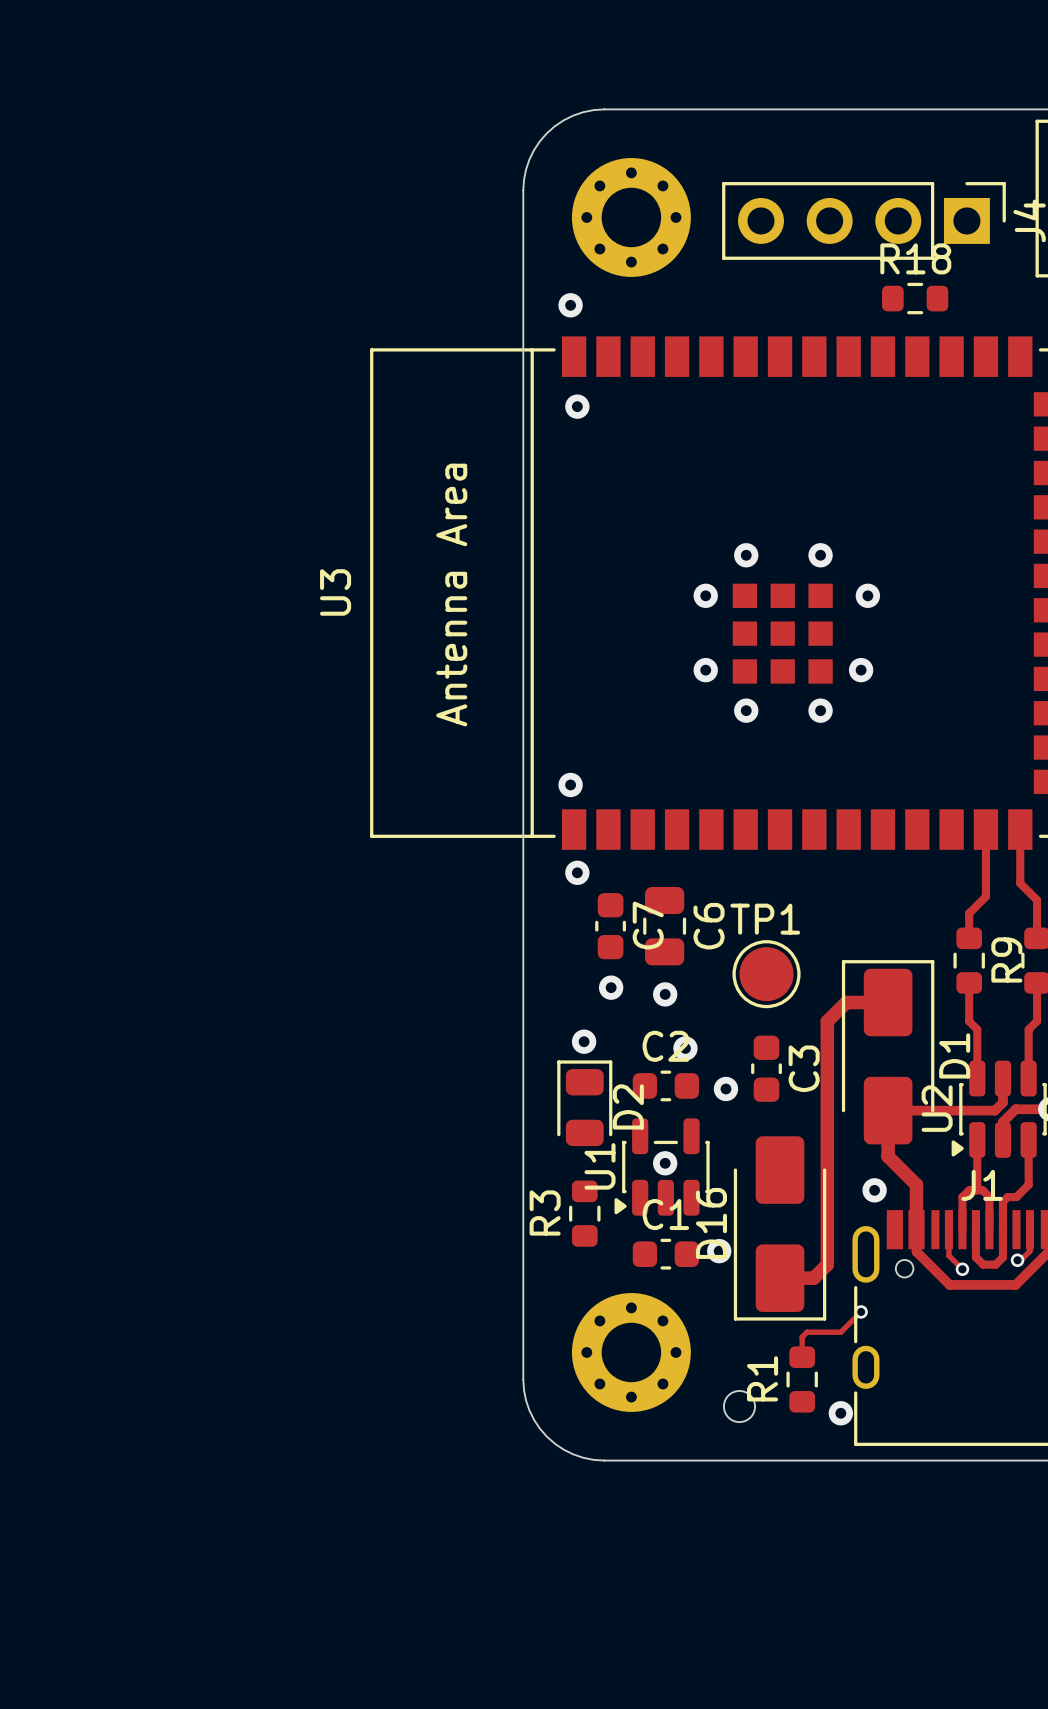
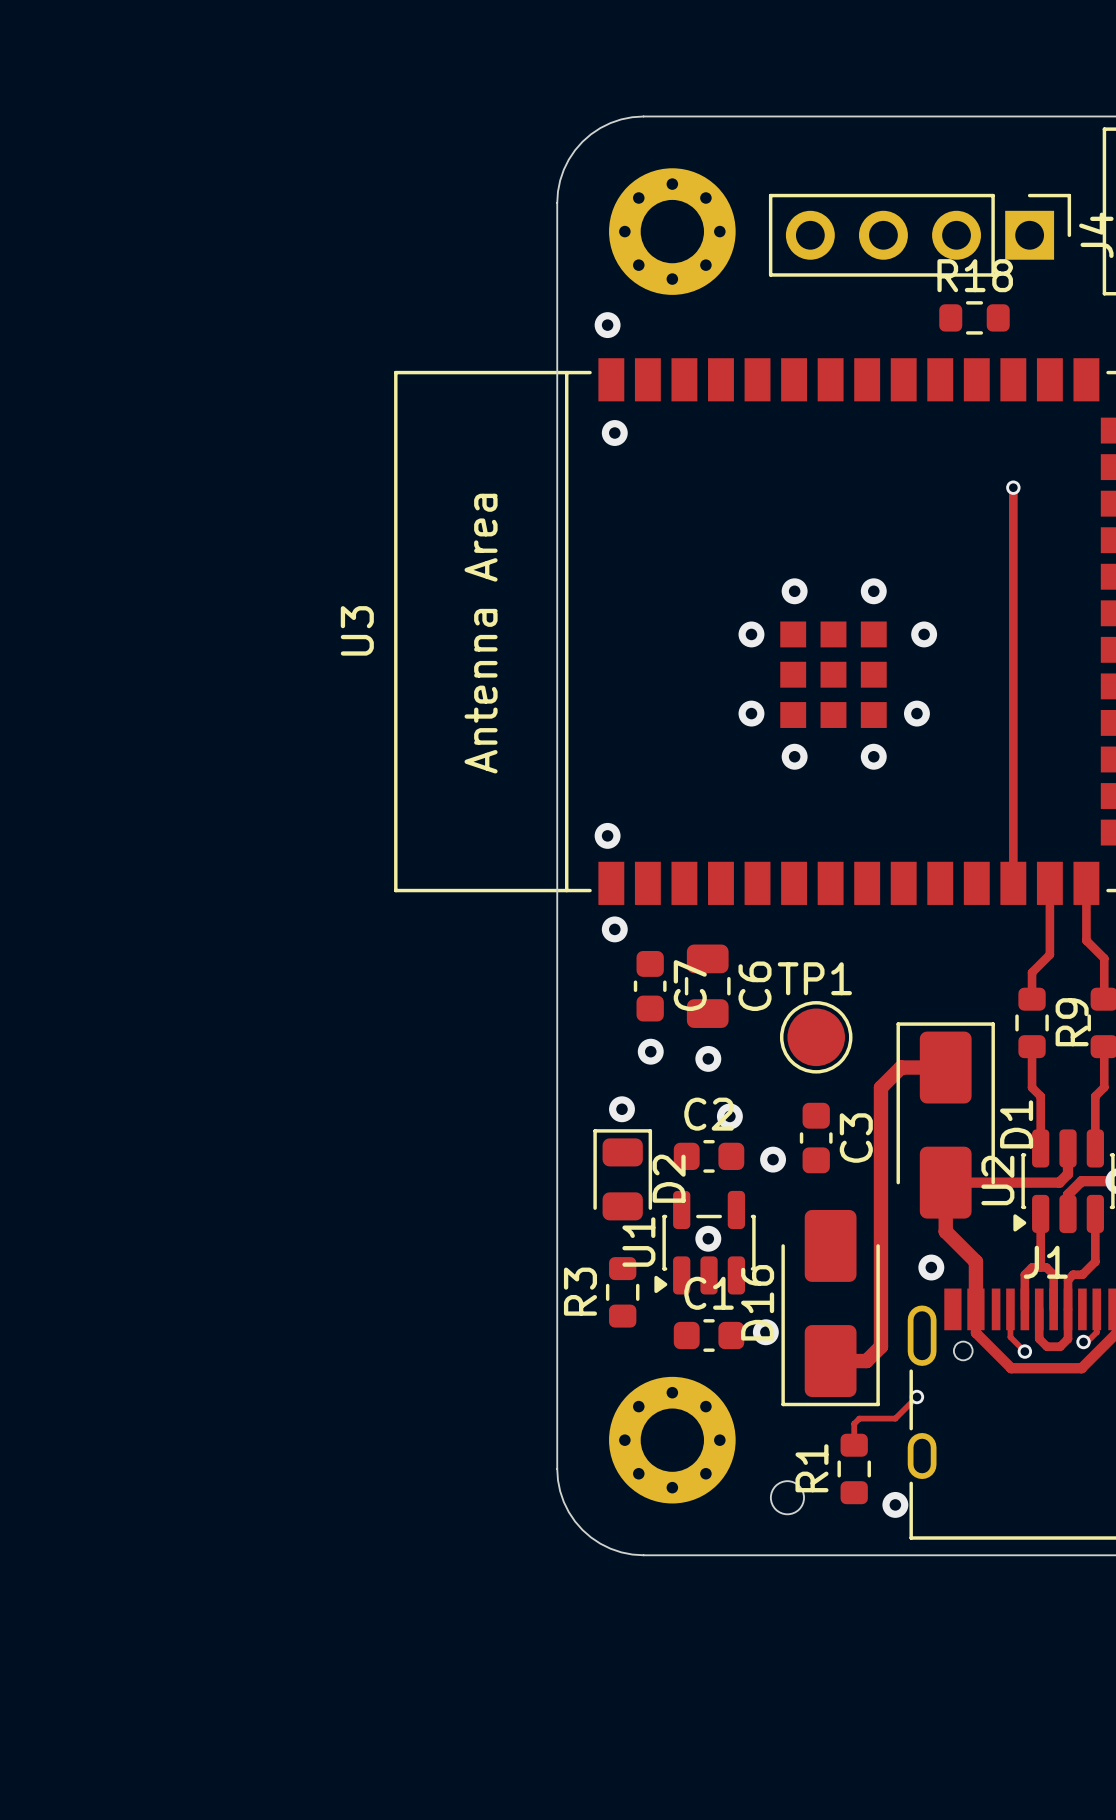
track: none -> (1013, 487) (1013, 883)
via: none -> (1013, 487)

